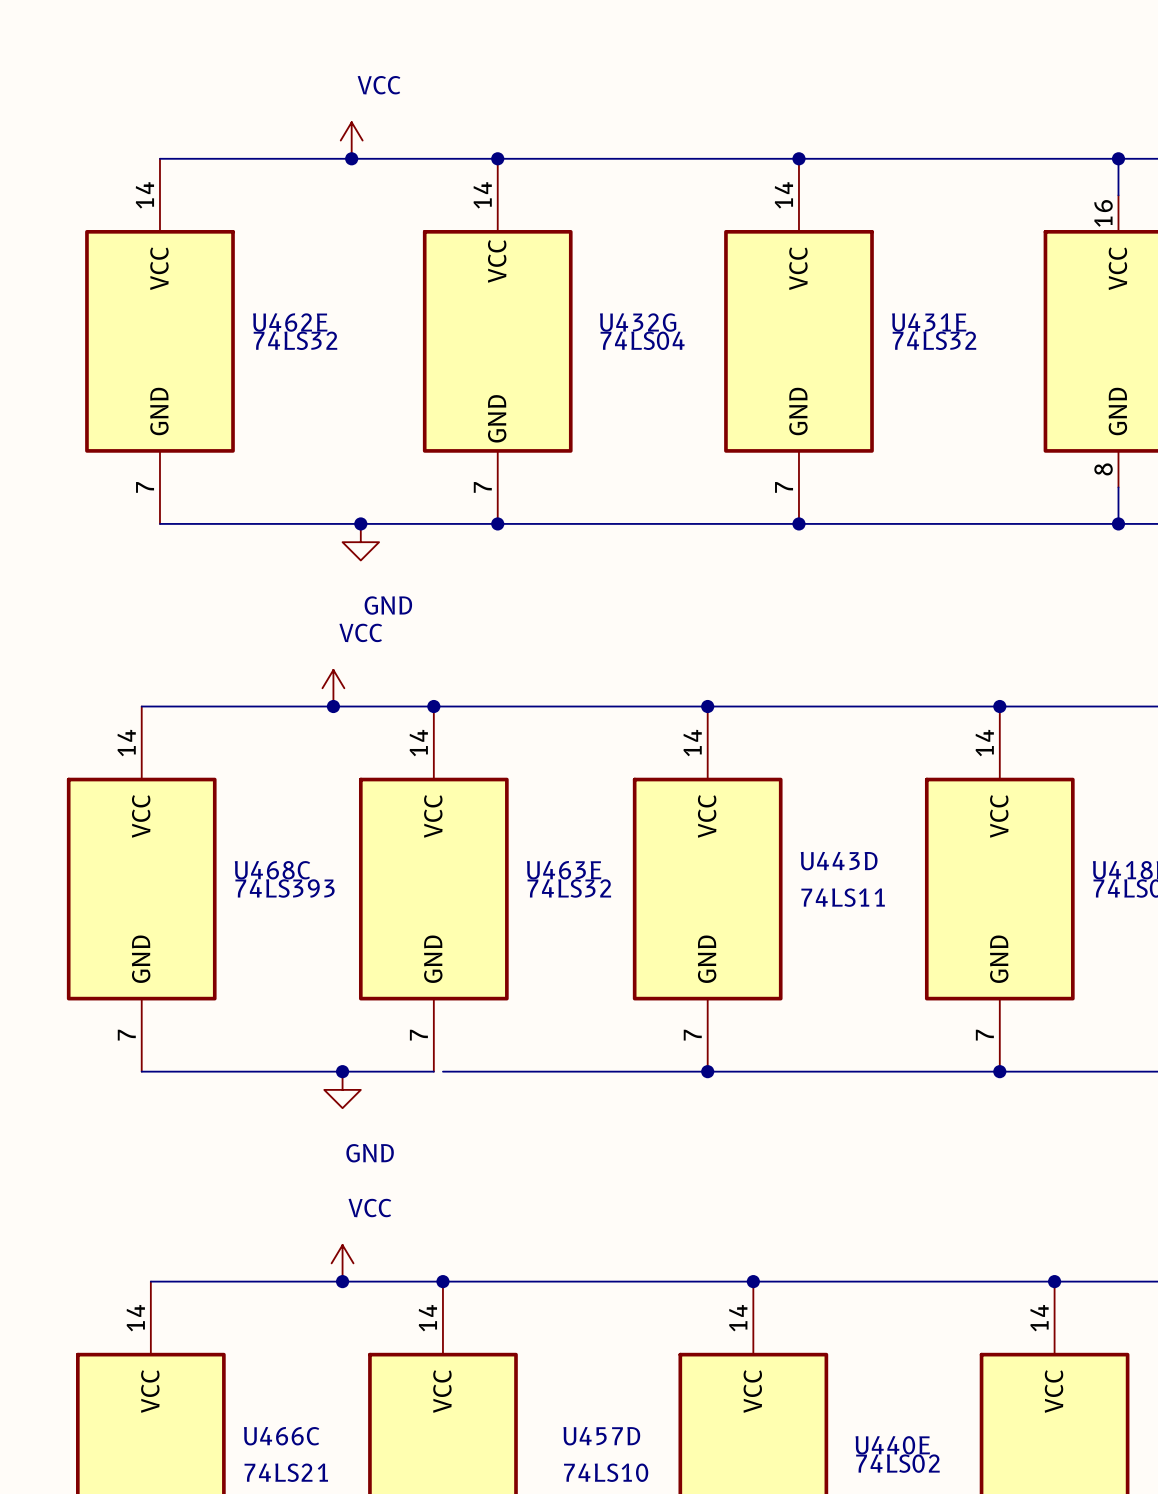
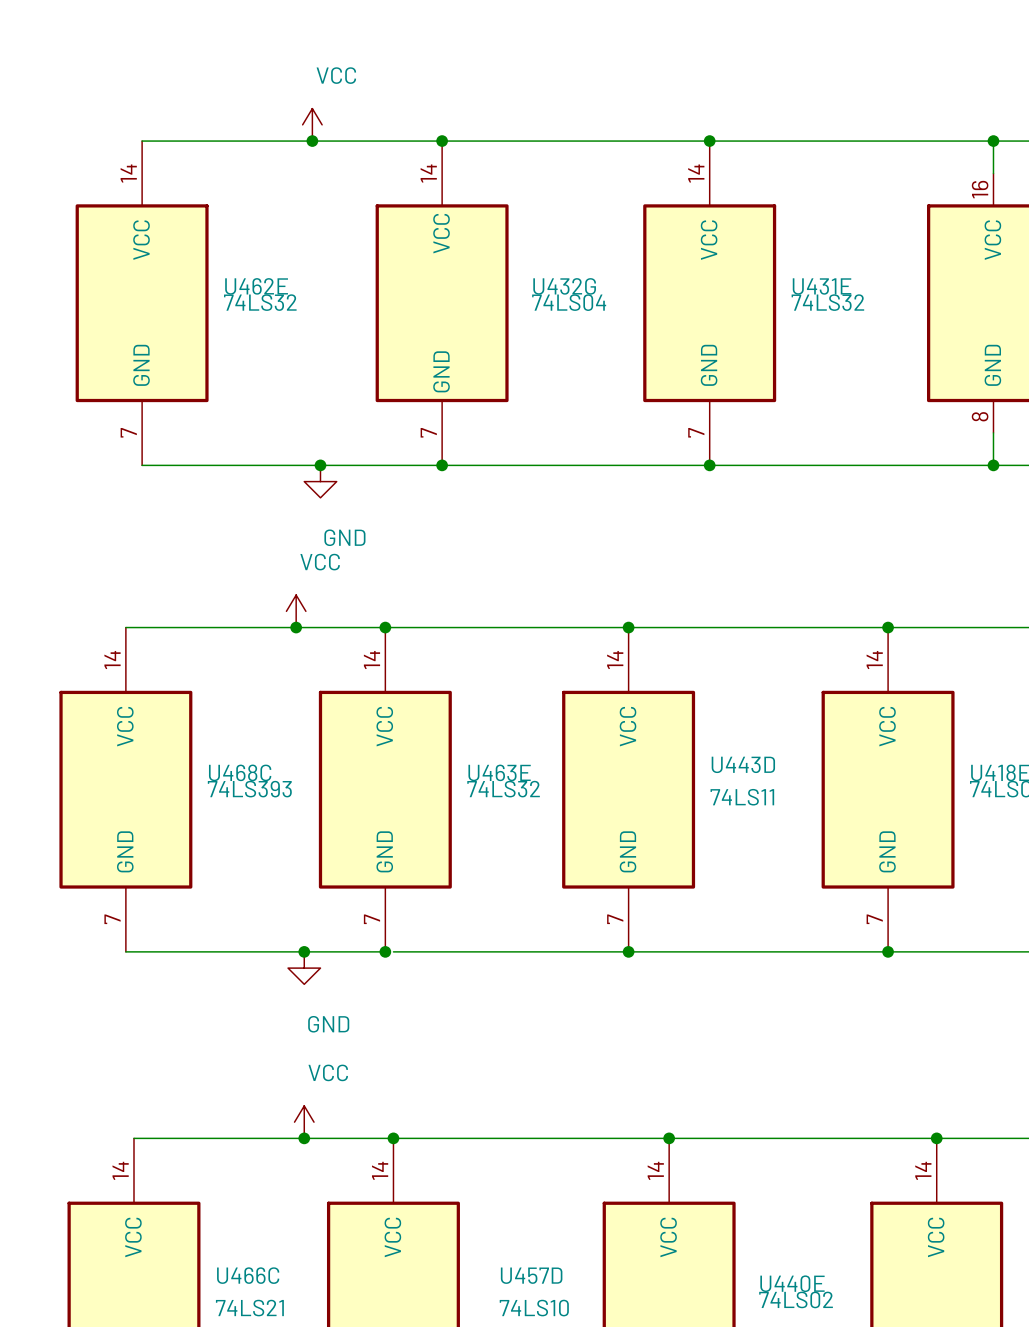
junction: none -> (385, 951)

